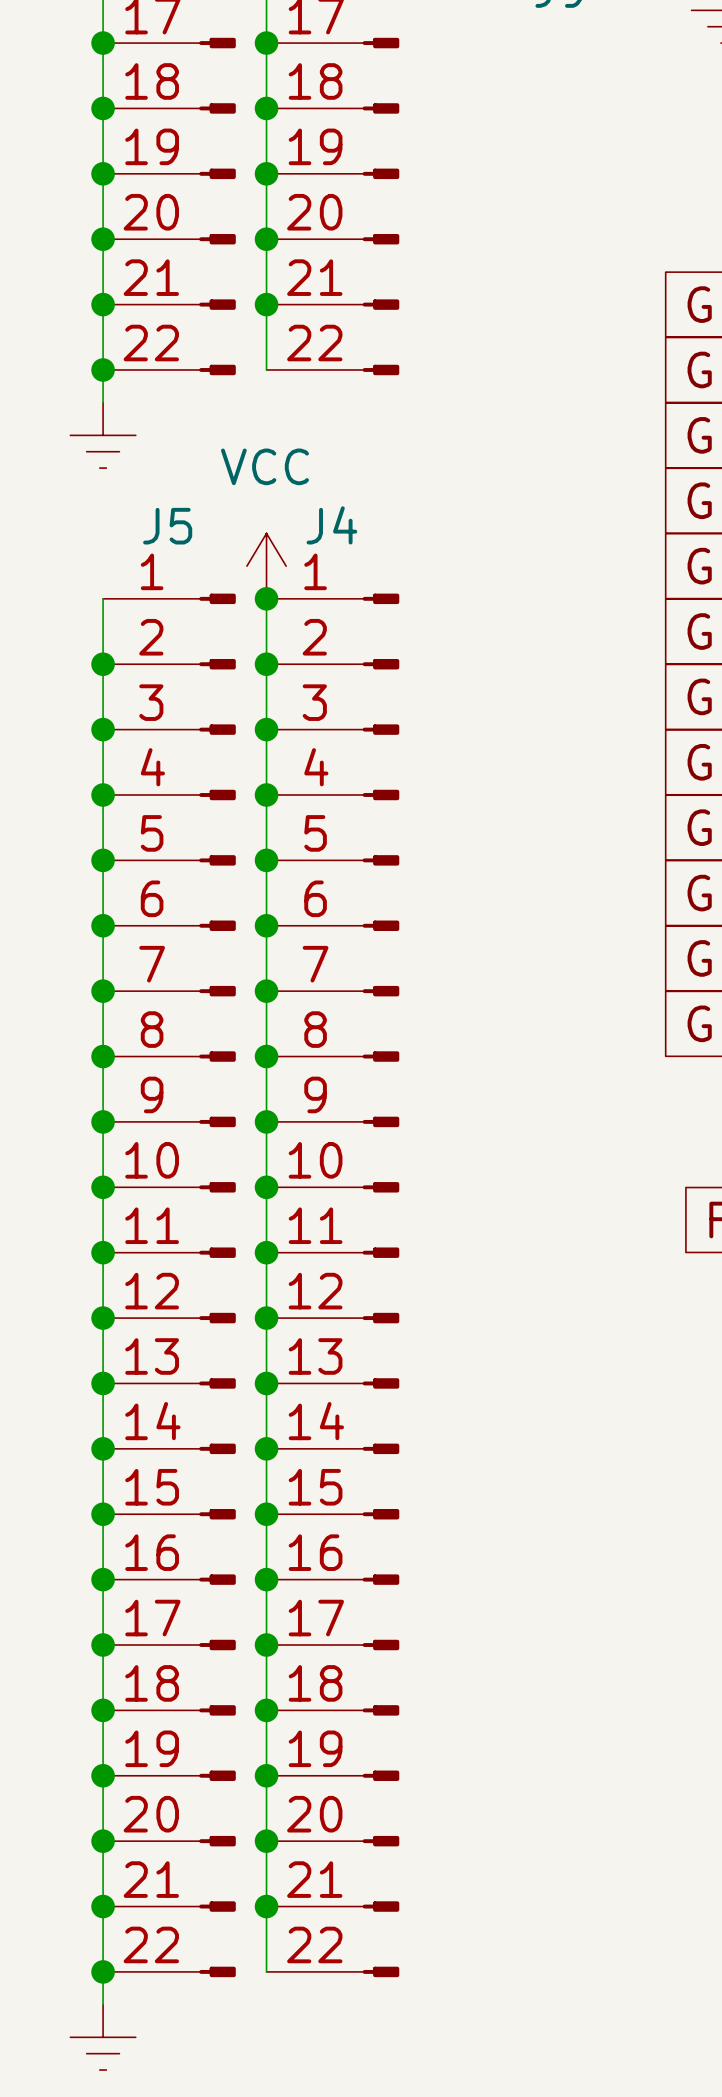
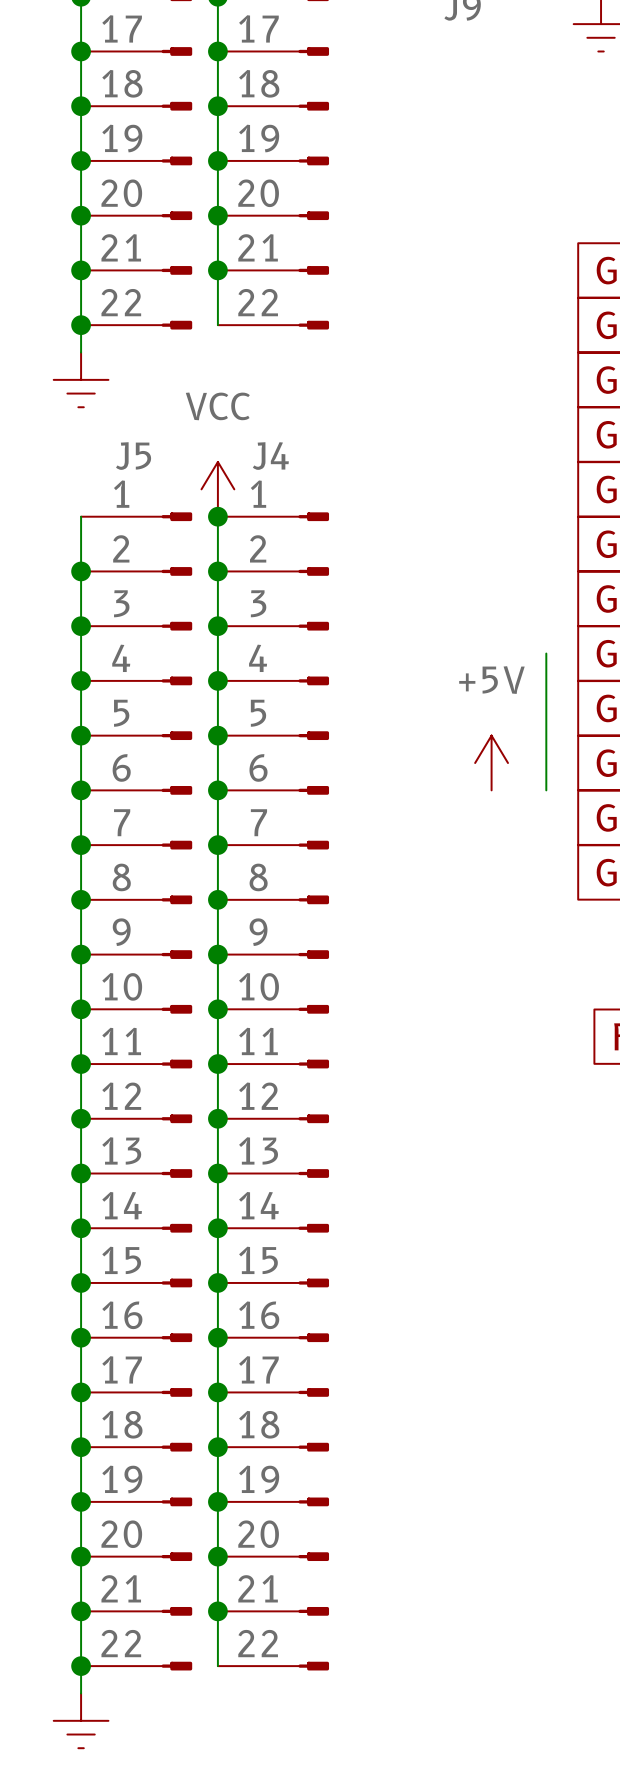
wire: none -> (546, 653) (546, 790)
power symbol: none -> +5V (491, 763)

